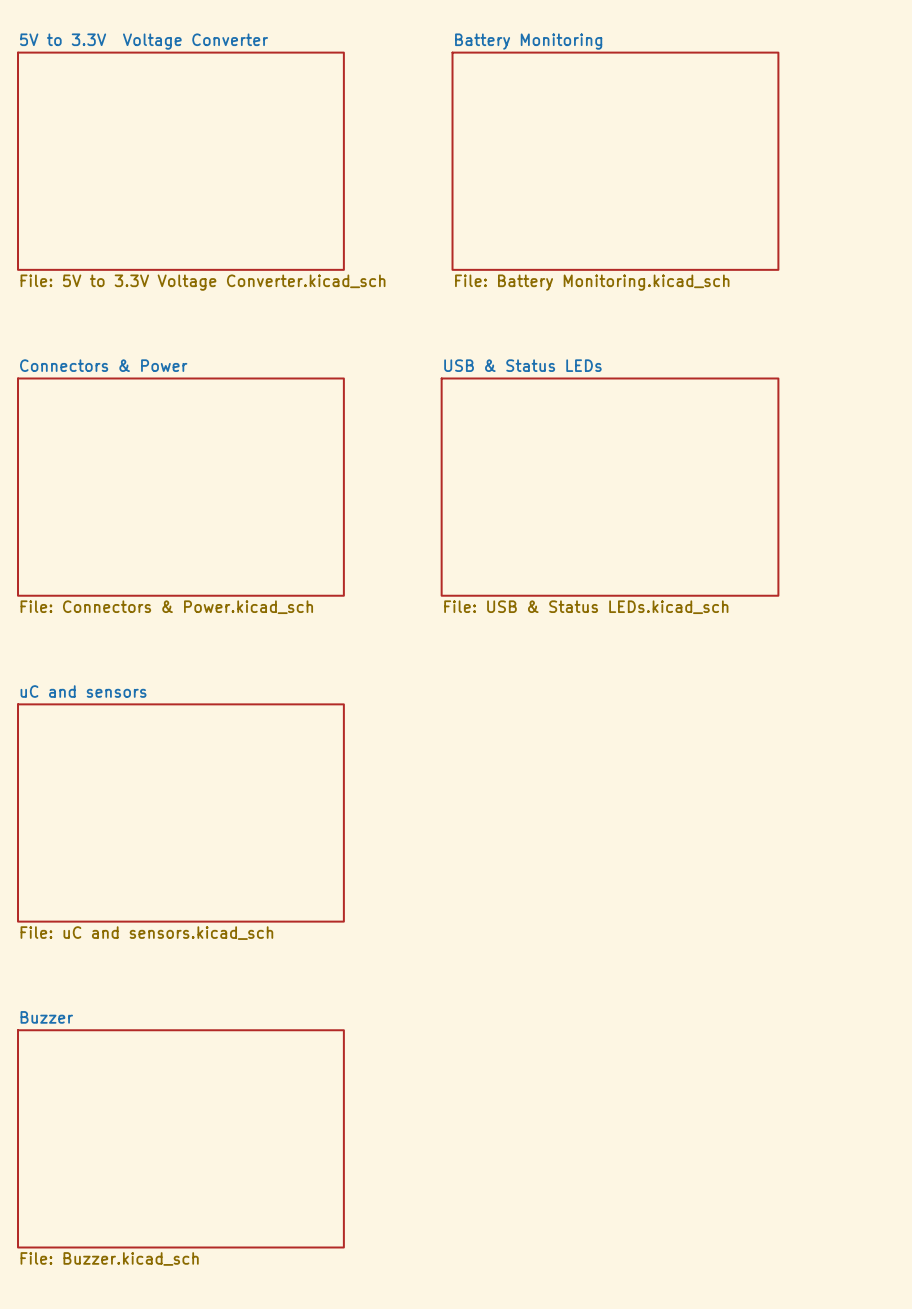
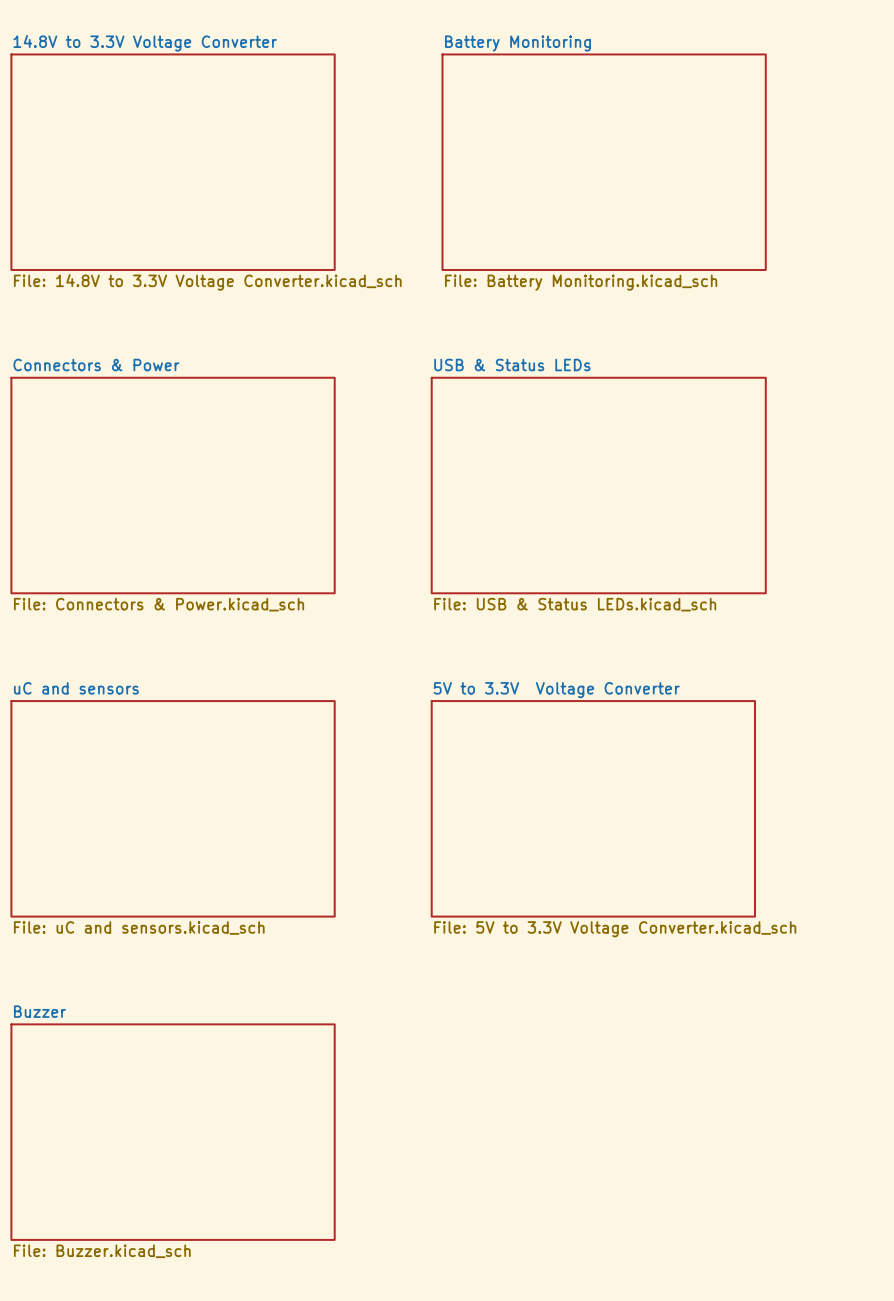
sheet 5V to 3.3V Voltage Converter name: 5V to 3.3V Voltage Converter (144, 41) -> 14.8V to 3.3V Voltage Converter (145, 43)
sheet 5V to 3.3V Voltage Converter value: File: 5V to 3.3V Voltage Converter.kicad_sch (203, 282) -> File: 14.8V to 3.3V Voltage Converter.kicad_sch (207, 282)
sheet 5V to 3.3V Voltage Converter: none -> File: 5V to 3.3V Voltage Converter.kicad_sch (593, 808)

